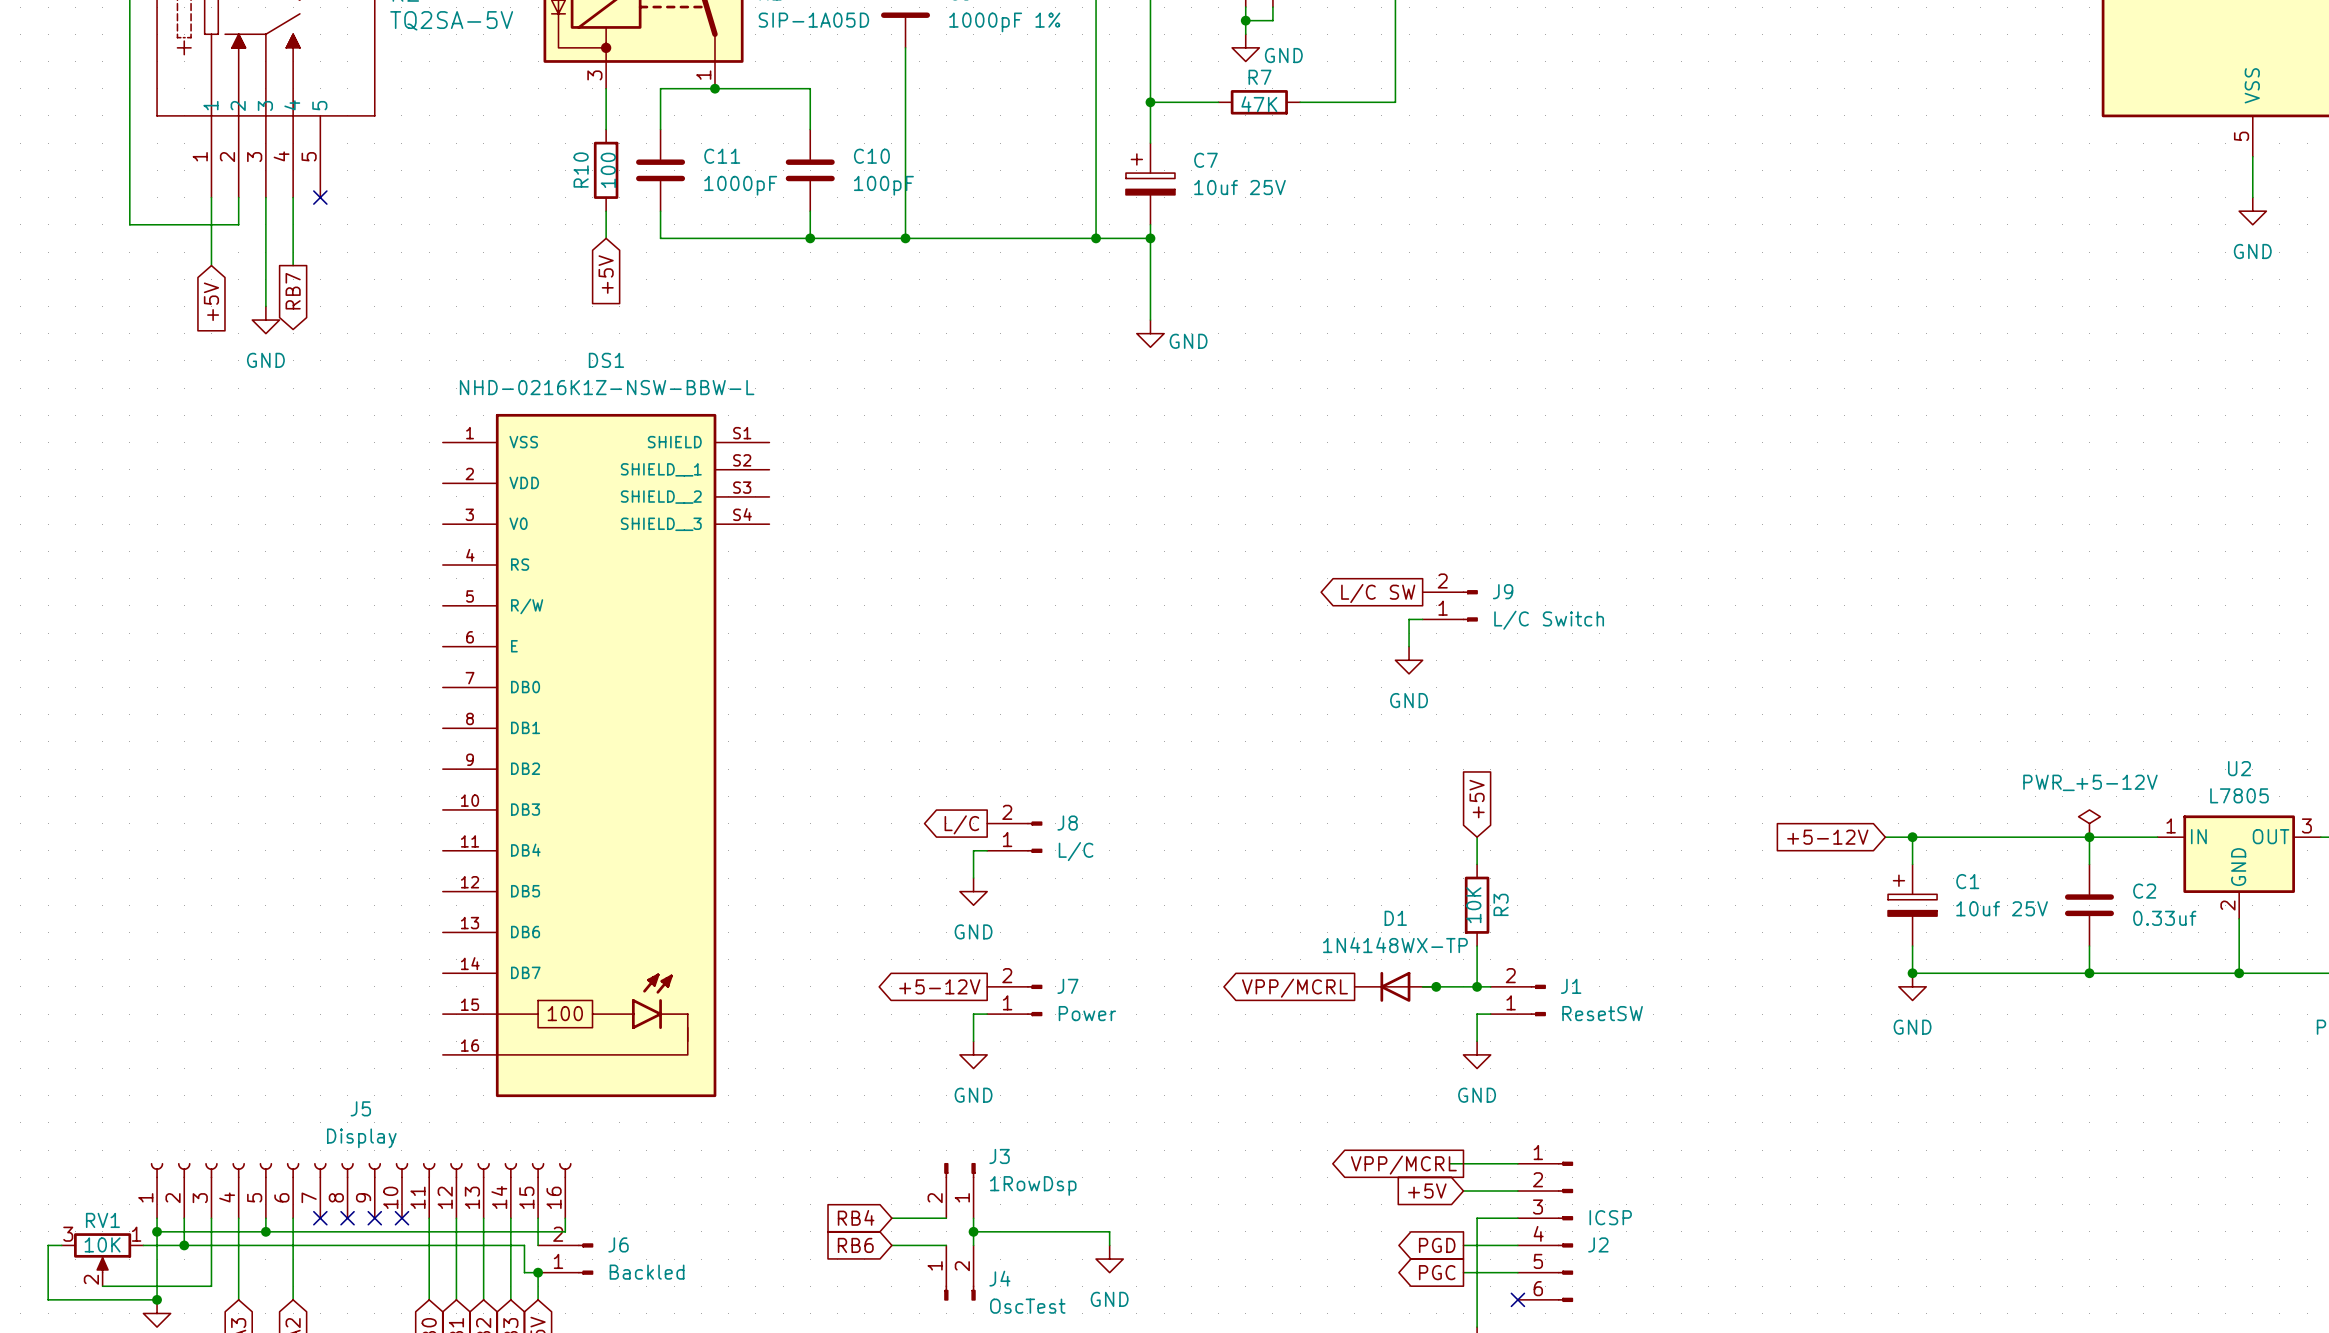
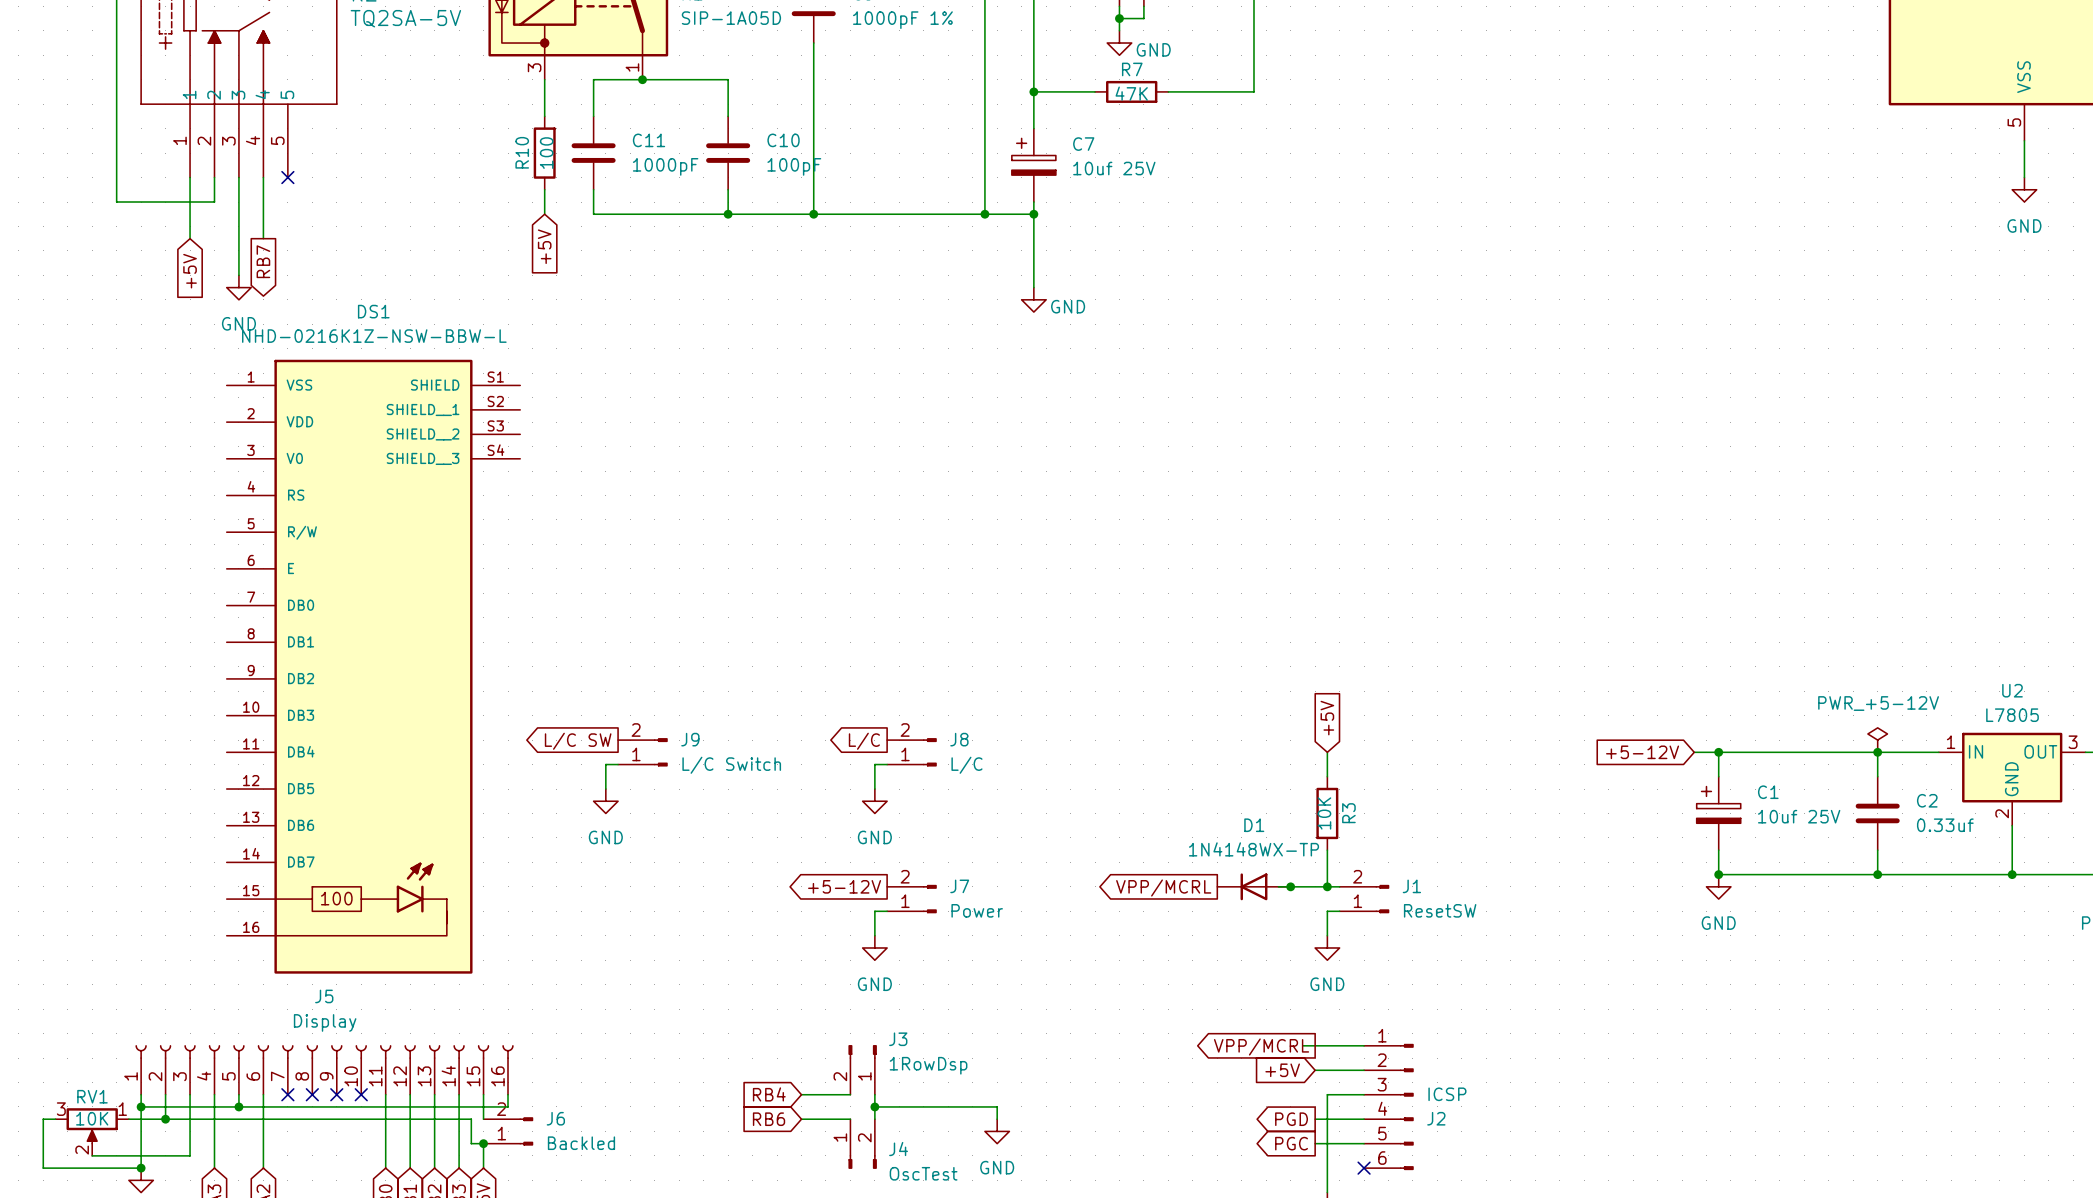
global label: L/C SW (1378, 593) -> none
J9 position: (1450, 605) -> (642, 752)
wire: (1422, 619) (1409, 619) (1409, 646) -> none
power symbol: GND (1409, 660) -> none
DS1 position: (606, 755) -> (373, 666)
global label: none -> L/C SW (578, 741)
power symbol: none -> GND (605, 801)

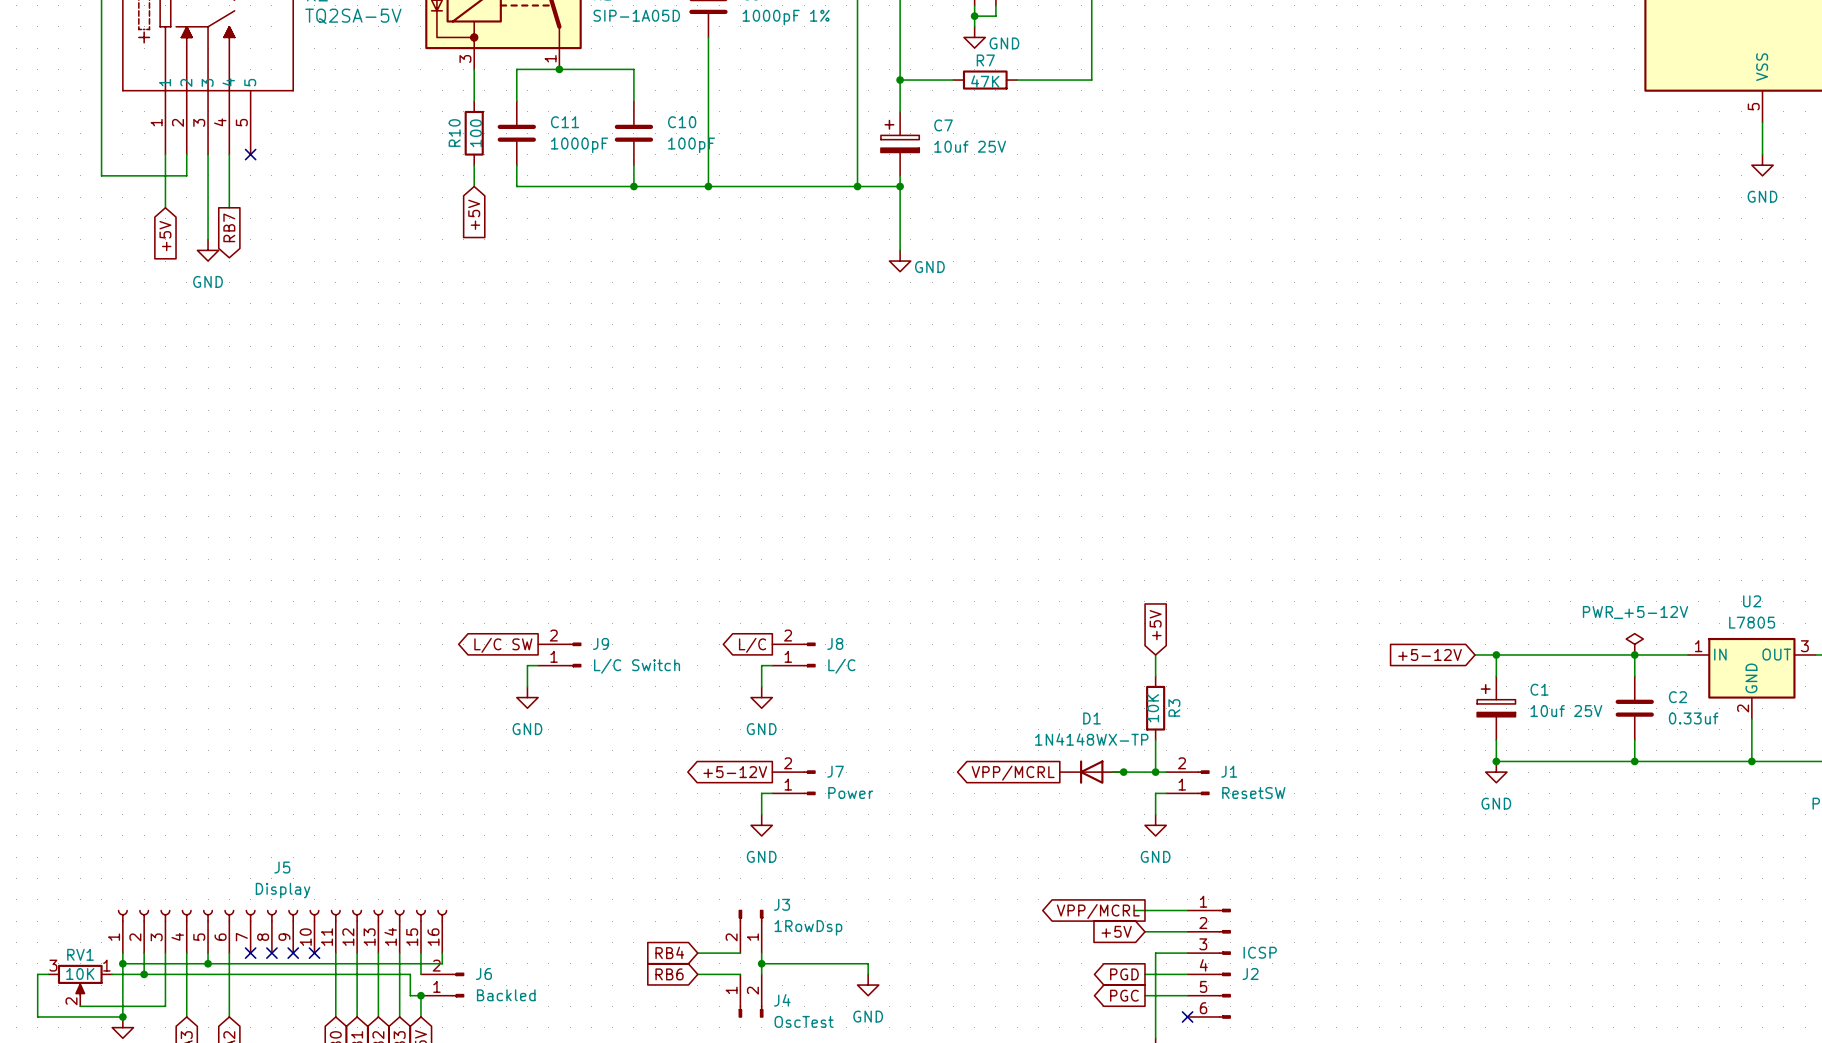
DS1: NHD-0216K1Z-NSW-BBW-L (373, 666) -> none

